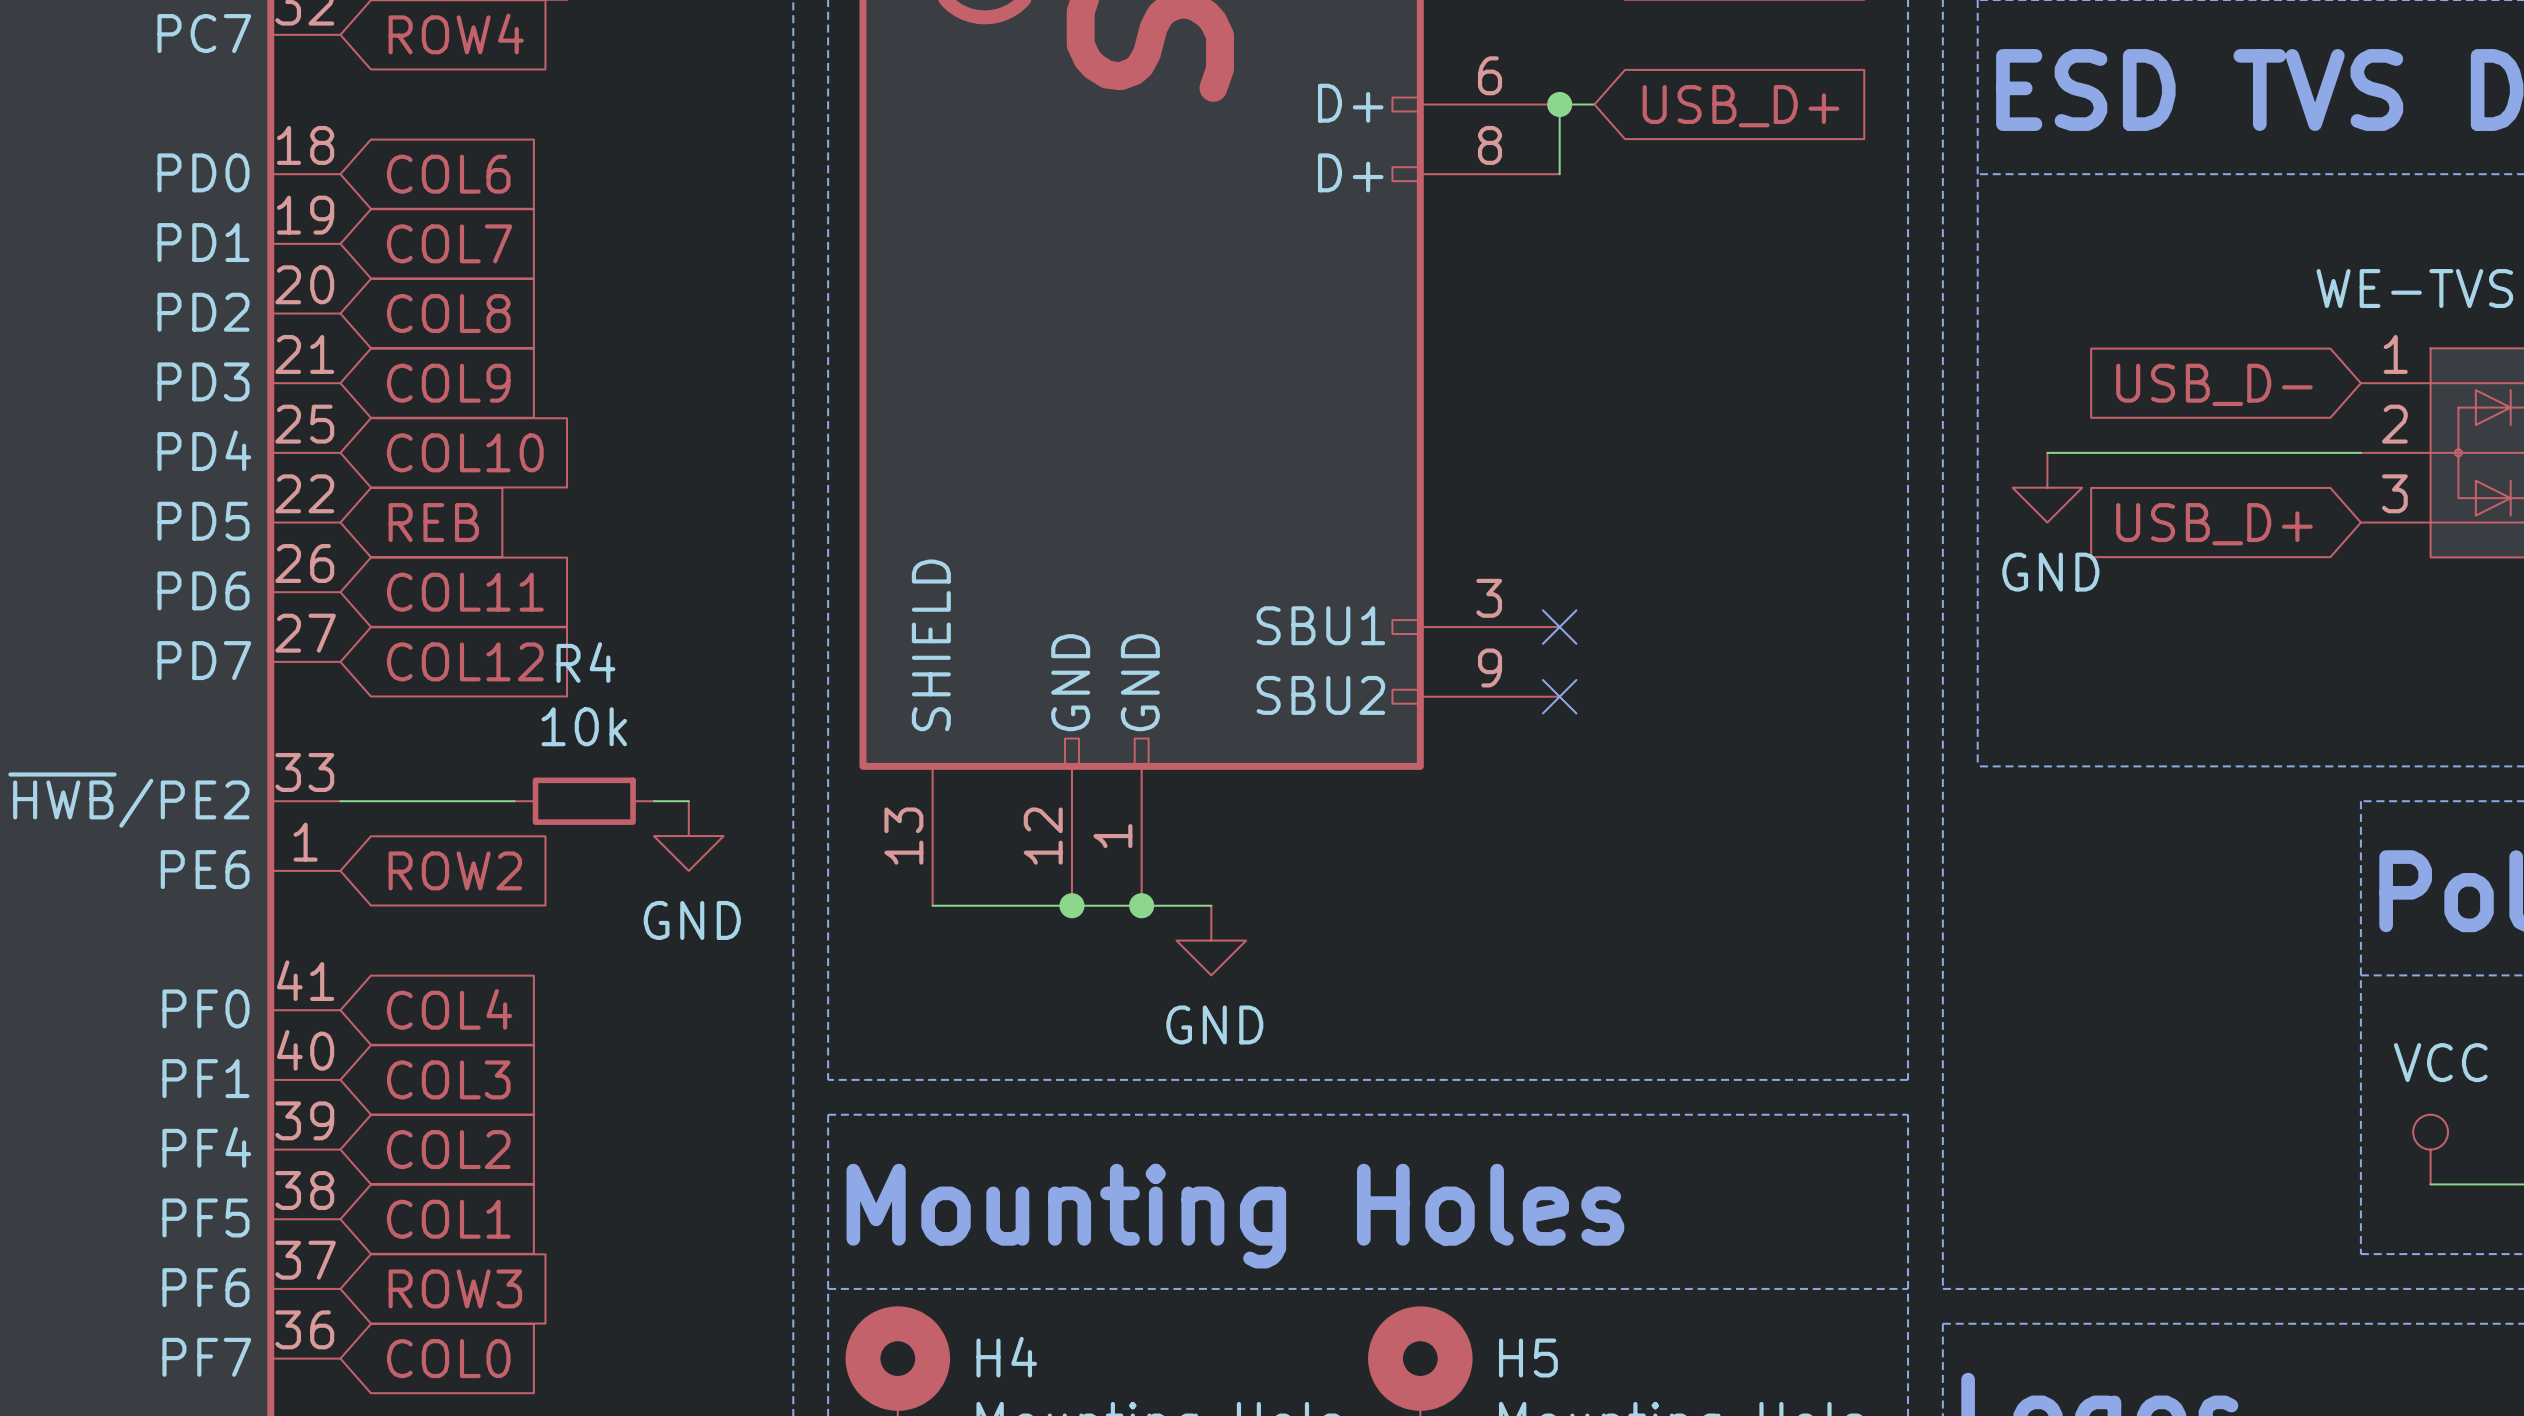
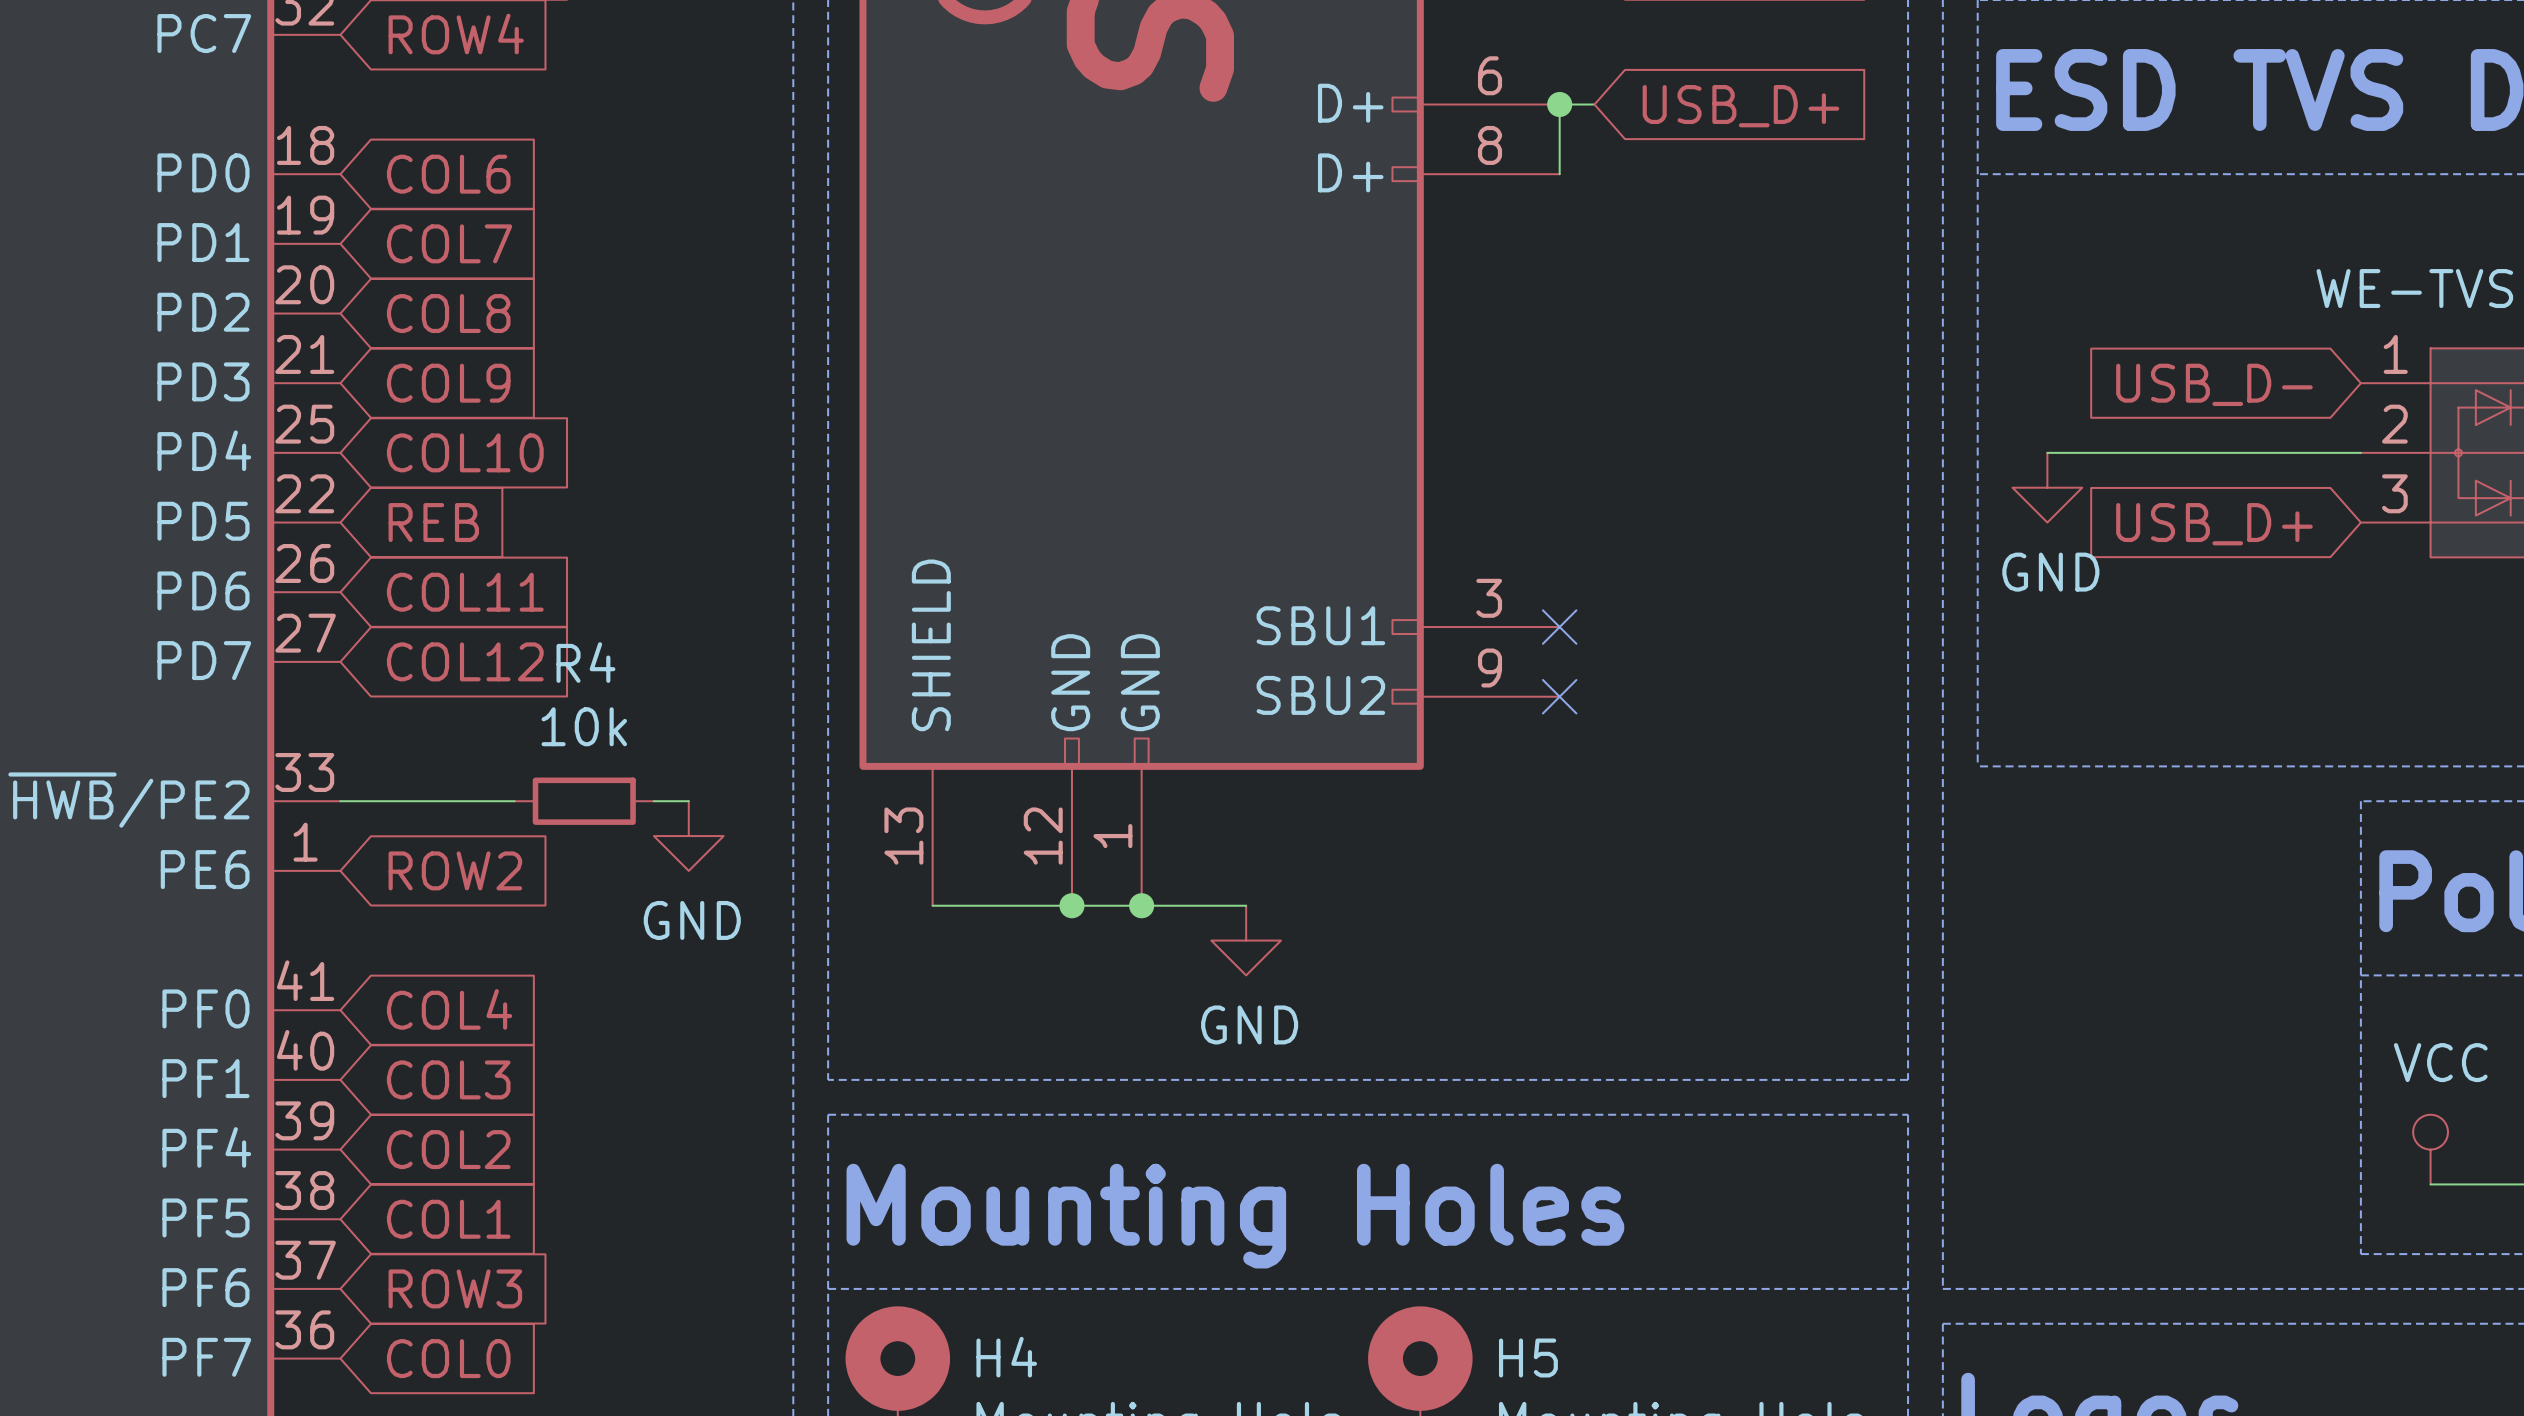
wire: none -> (1211, 905) (1246, 905)
power symbol position: GND (1211, 940) -> GND (1246, 940)

